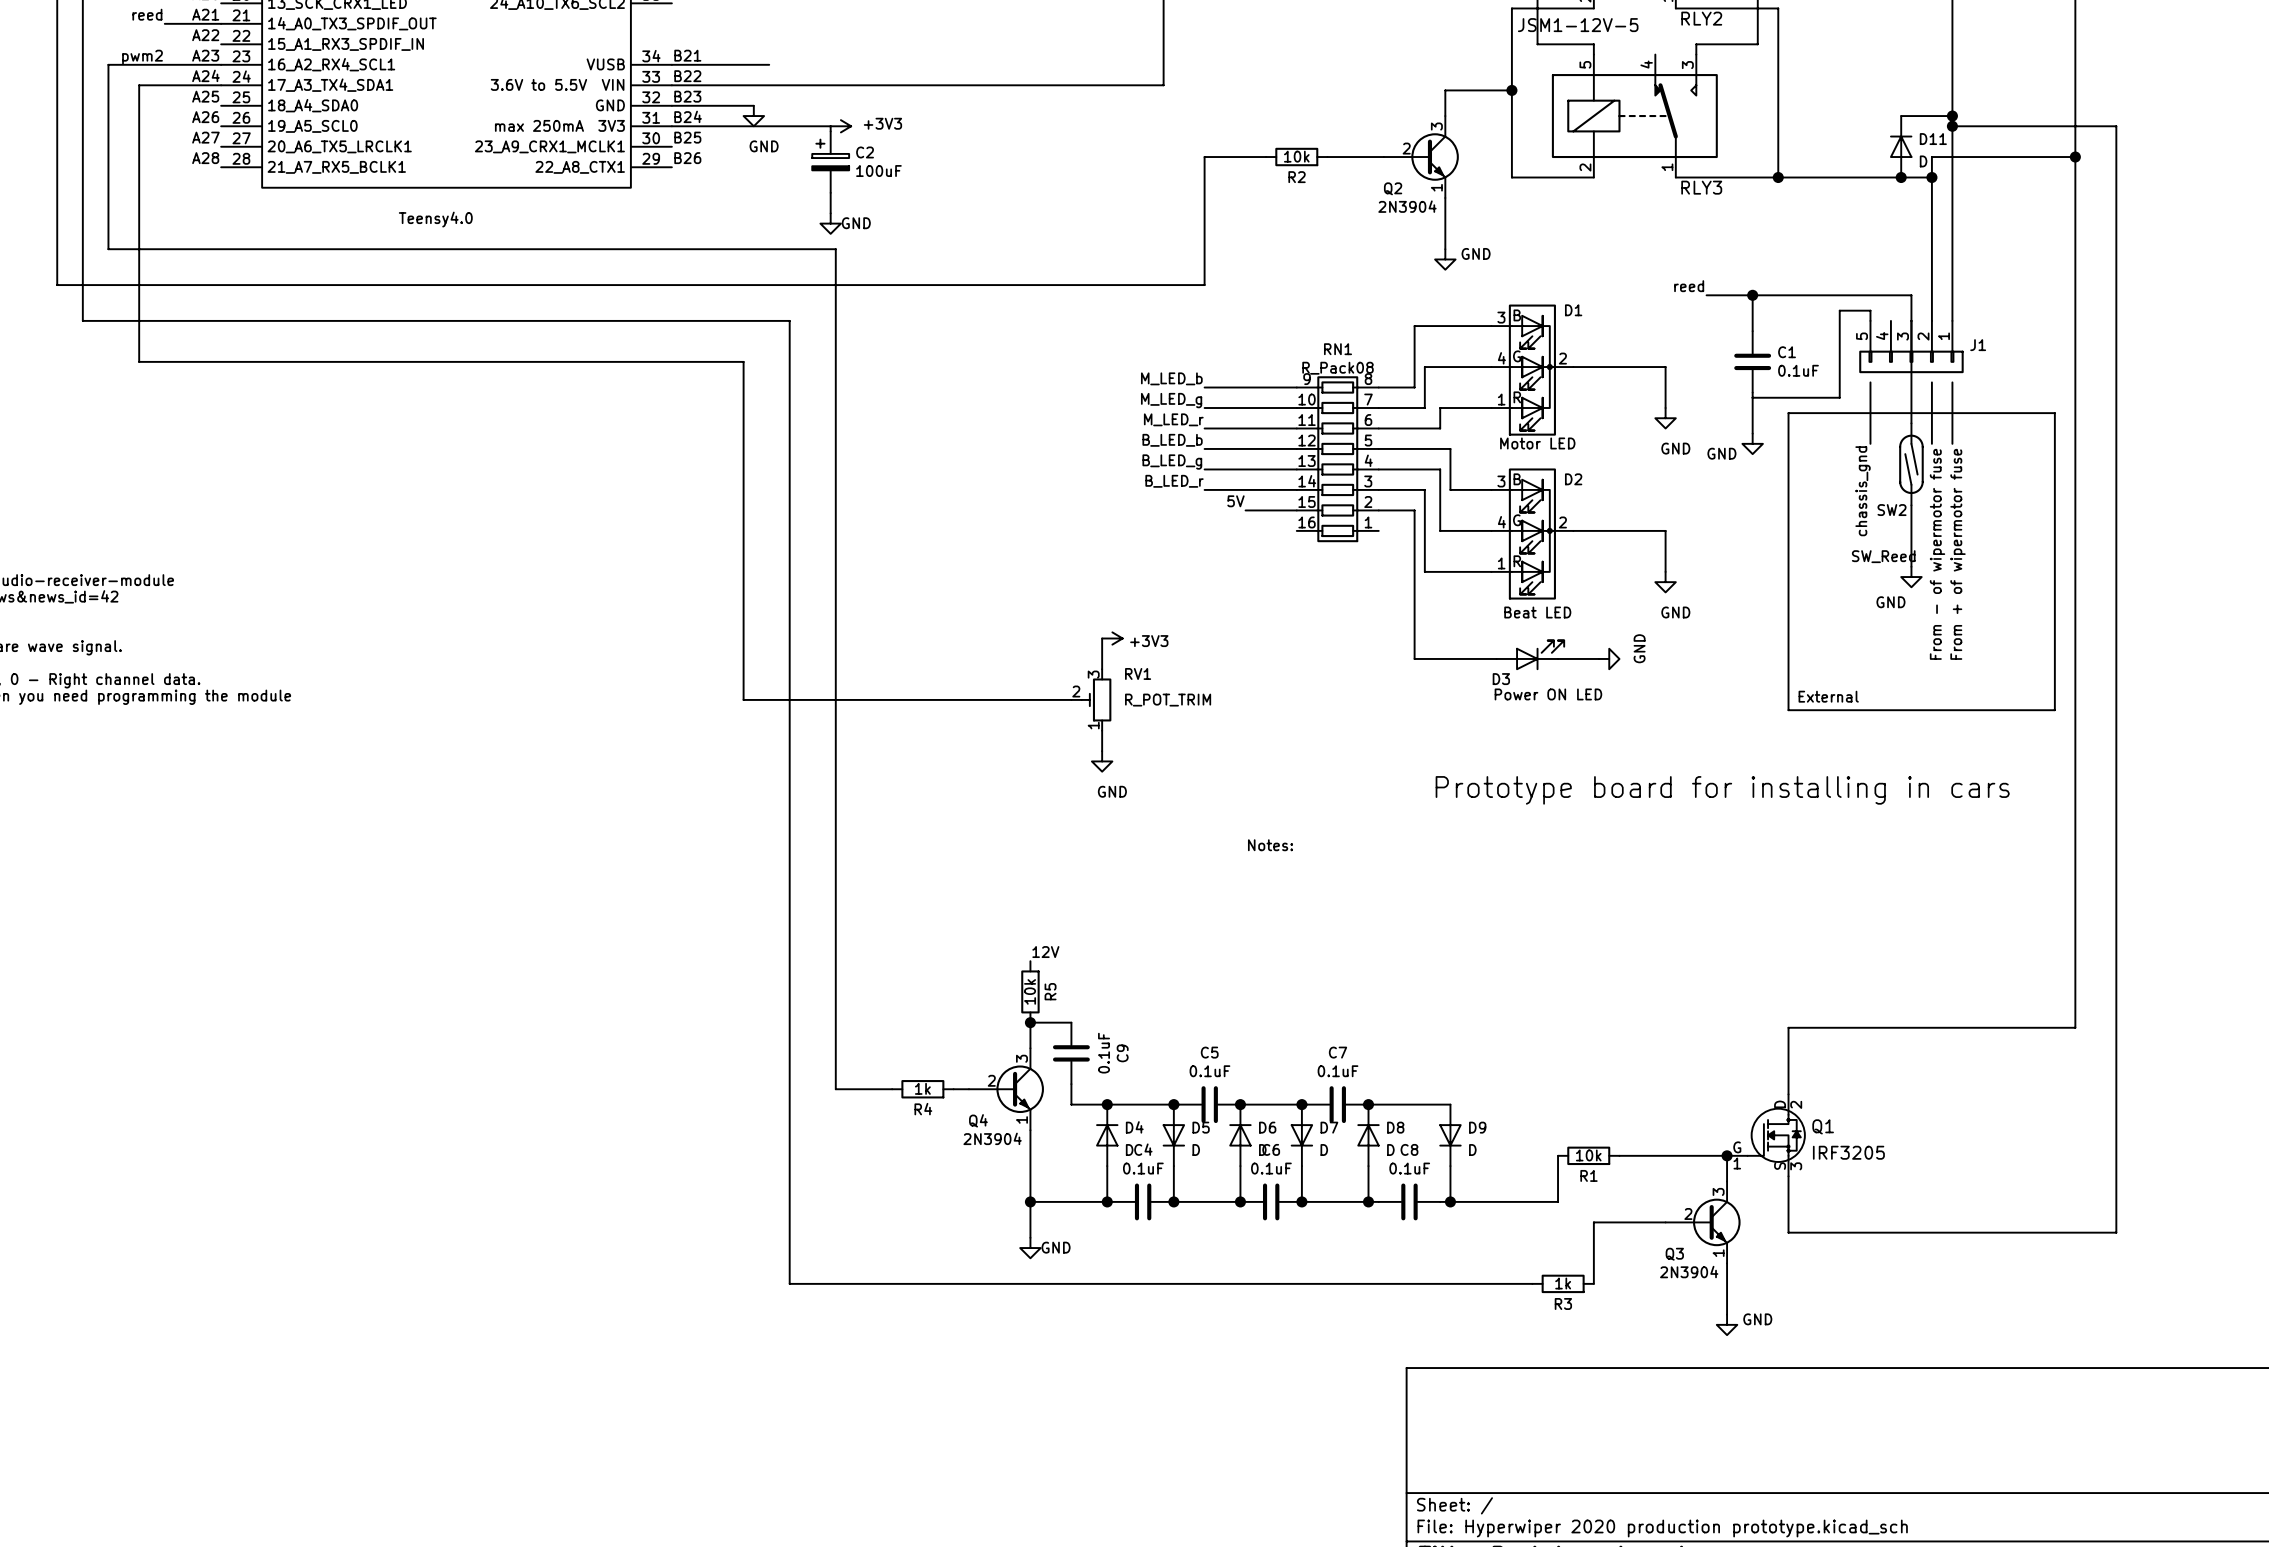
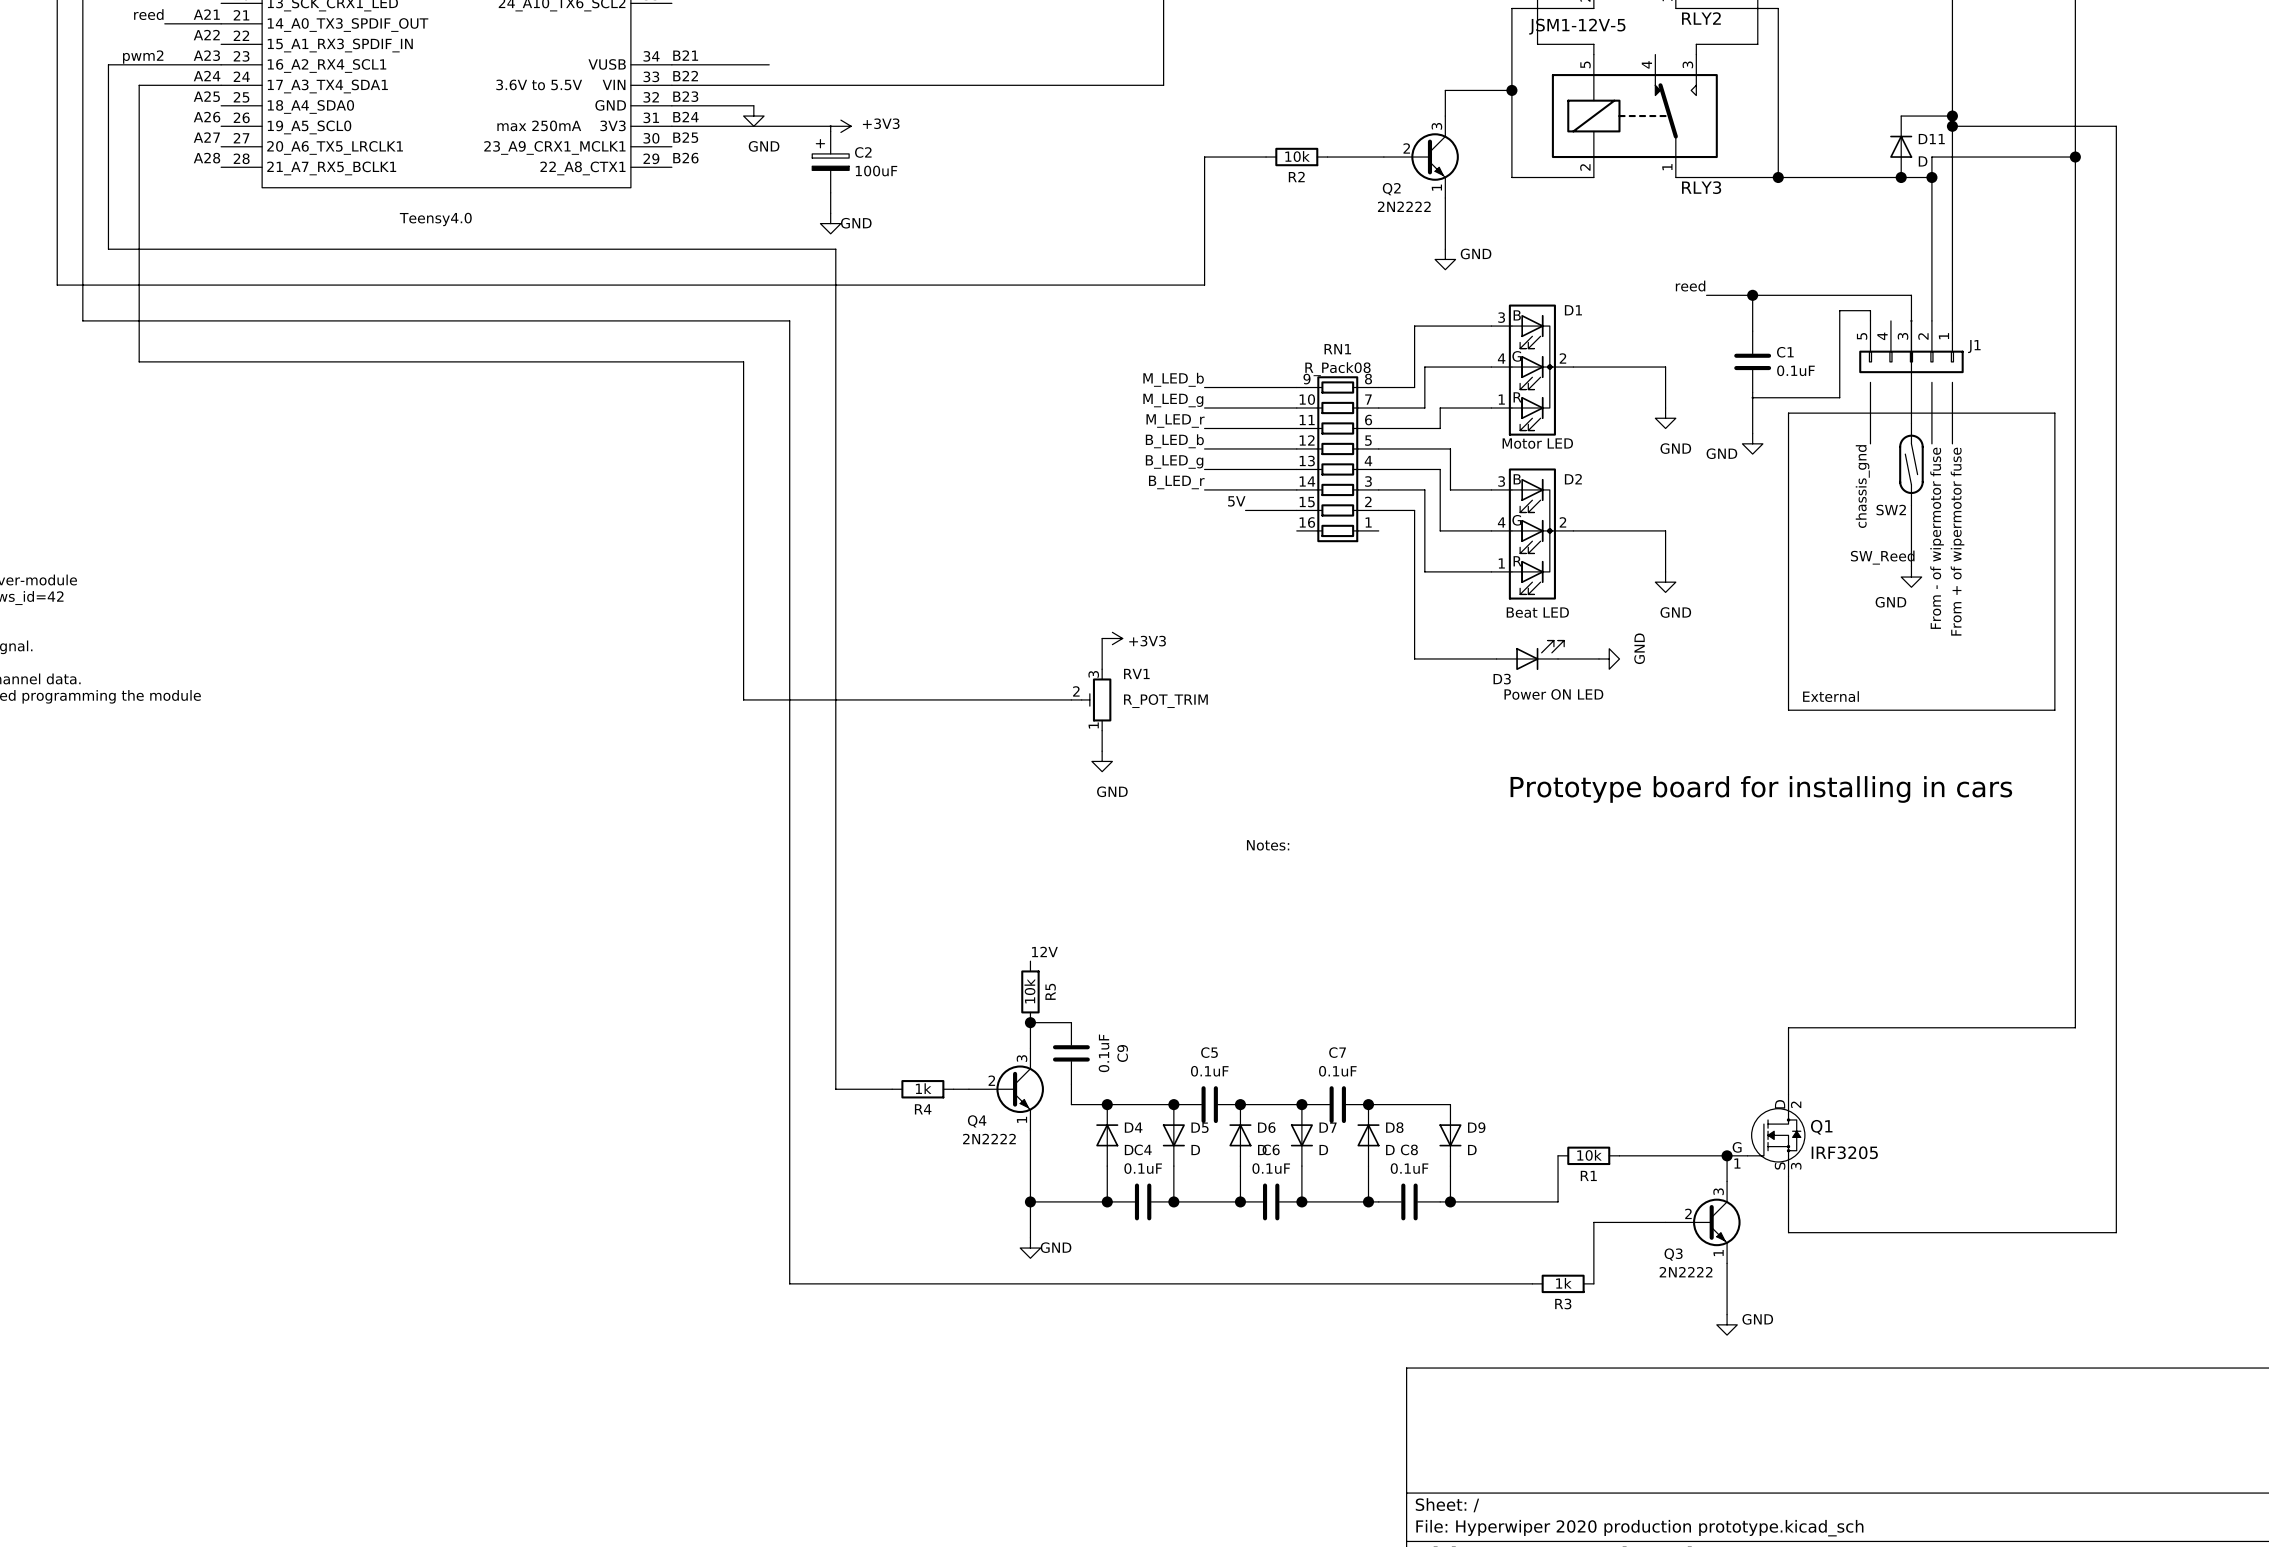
Q2 value: 2N3904 (1407, 206) -> 2N2222 (1404, 206)
Q4 value: 2N3904 (992, 1138) -> 2N2222 (989, 1139)
Q3 value: 2N3904 (1689, 1272) -> 2N2222 (1686, 1272)

